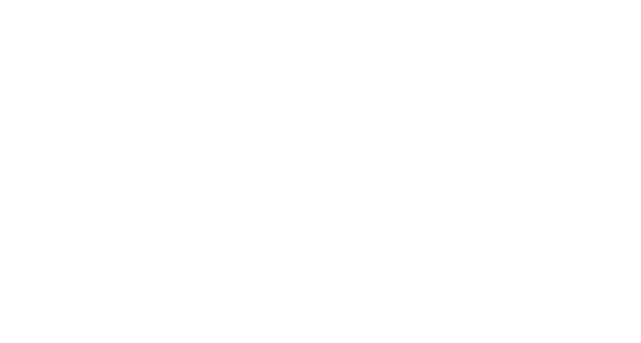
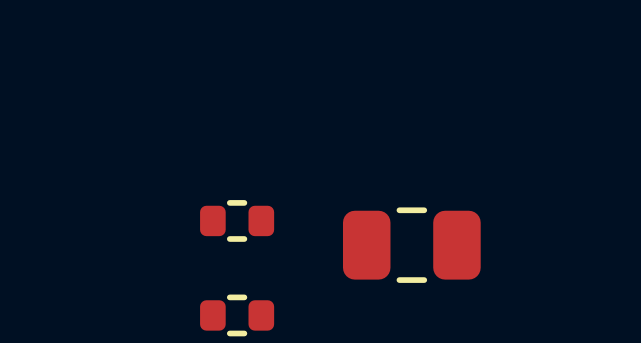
part: none -> (237, 220)
part: none -> (411, 245)
part: none -> (237, 315)

